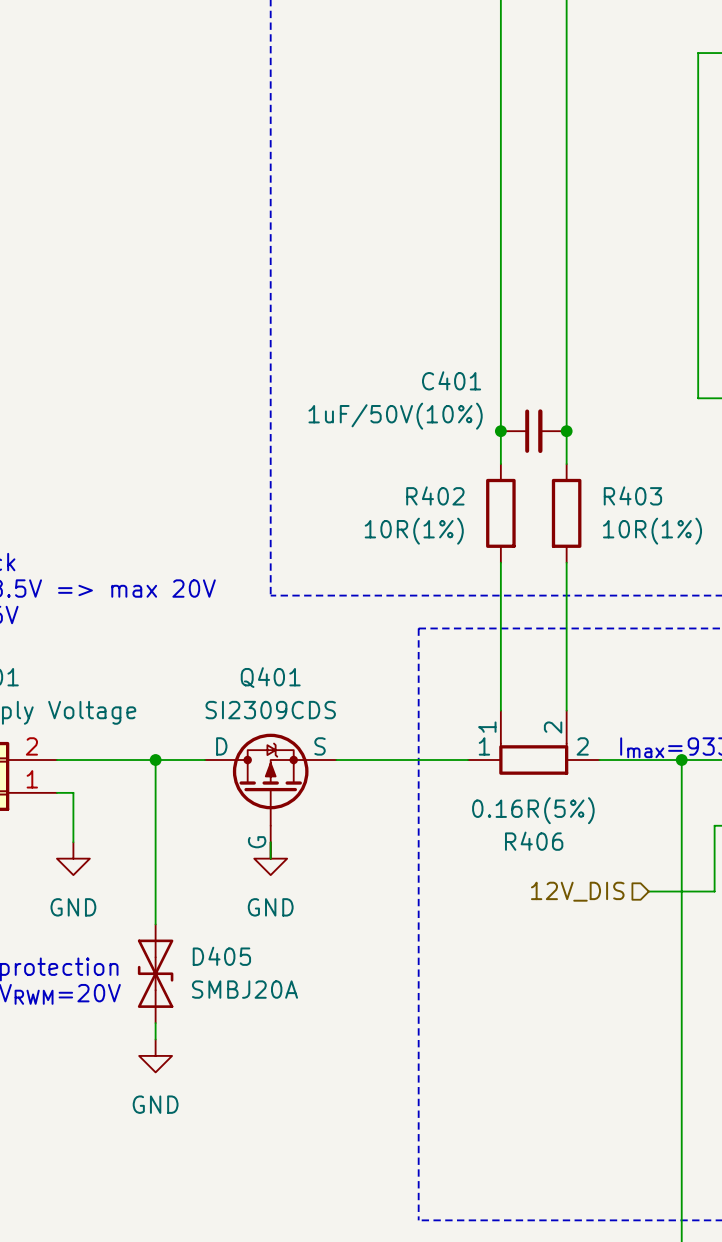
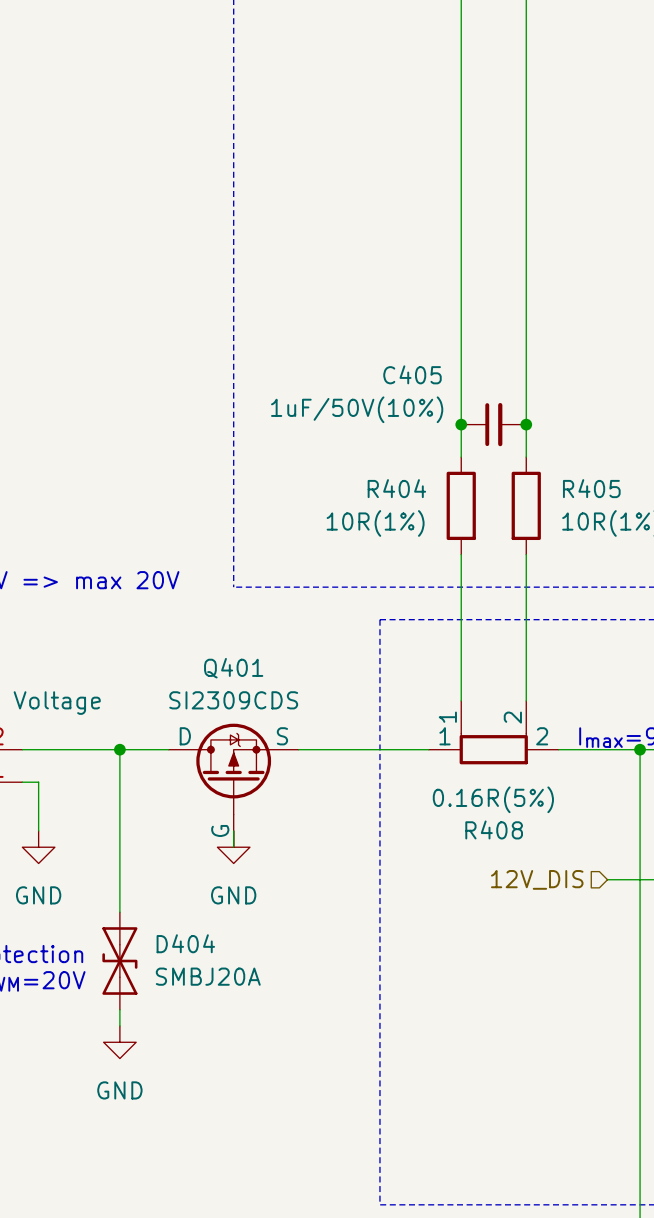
C401 name: C401 (451, 380) -> C405 (412, 374)
R402 name: R402 (435, 495) -> R404 (396, 488)
R403 name: R403 (632, 495) -> R405 (591, 488)
R406 name: R406 (534, 841) -> R408 (494, 829)
D405 name: D405 (221, 956) -> D404 (185, 943)

